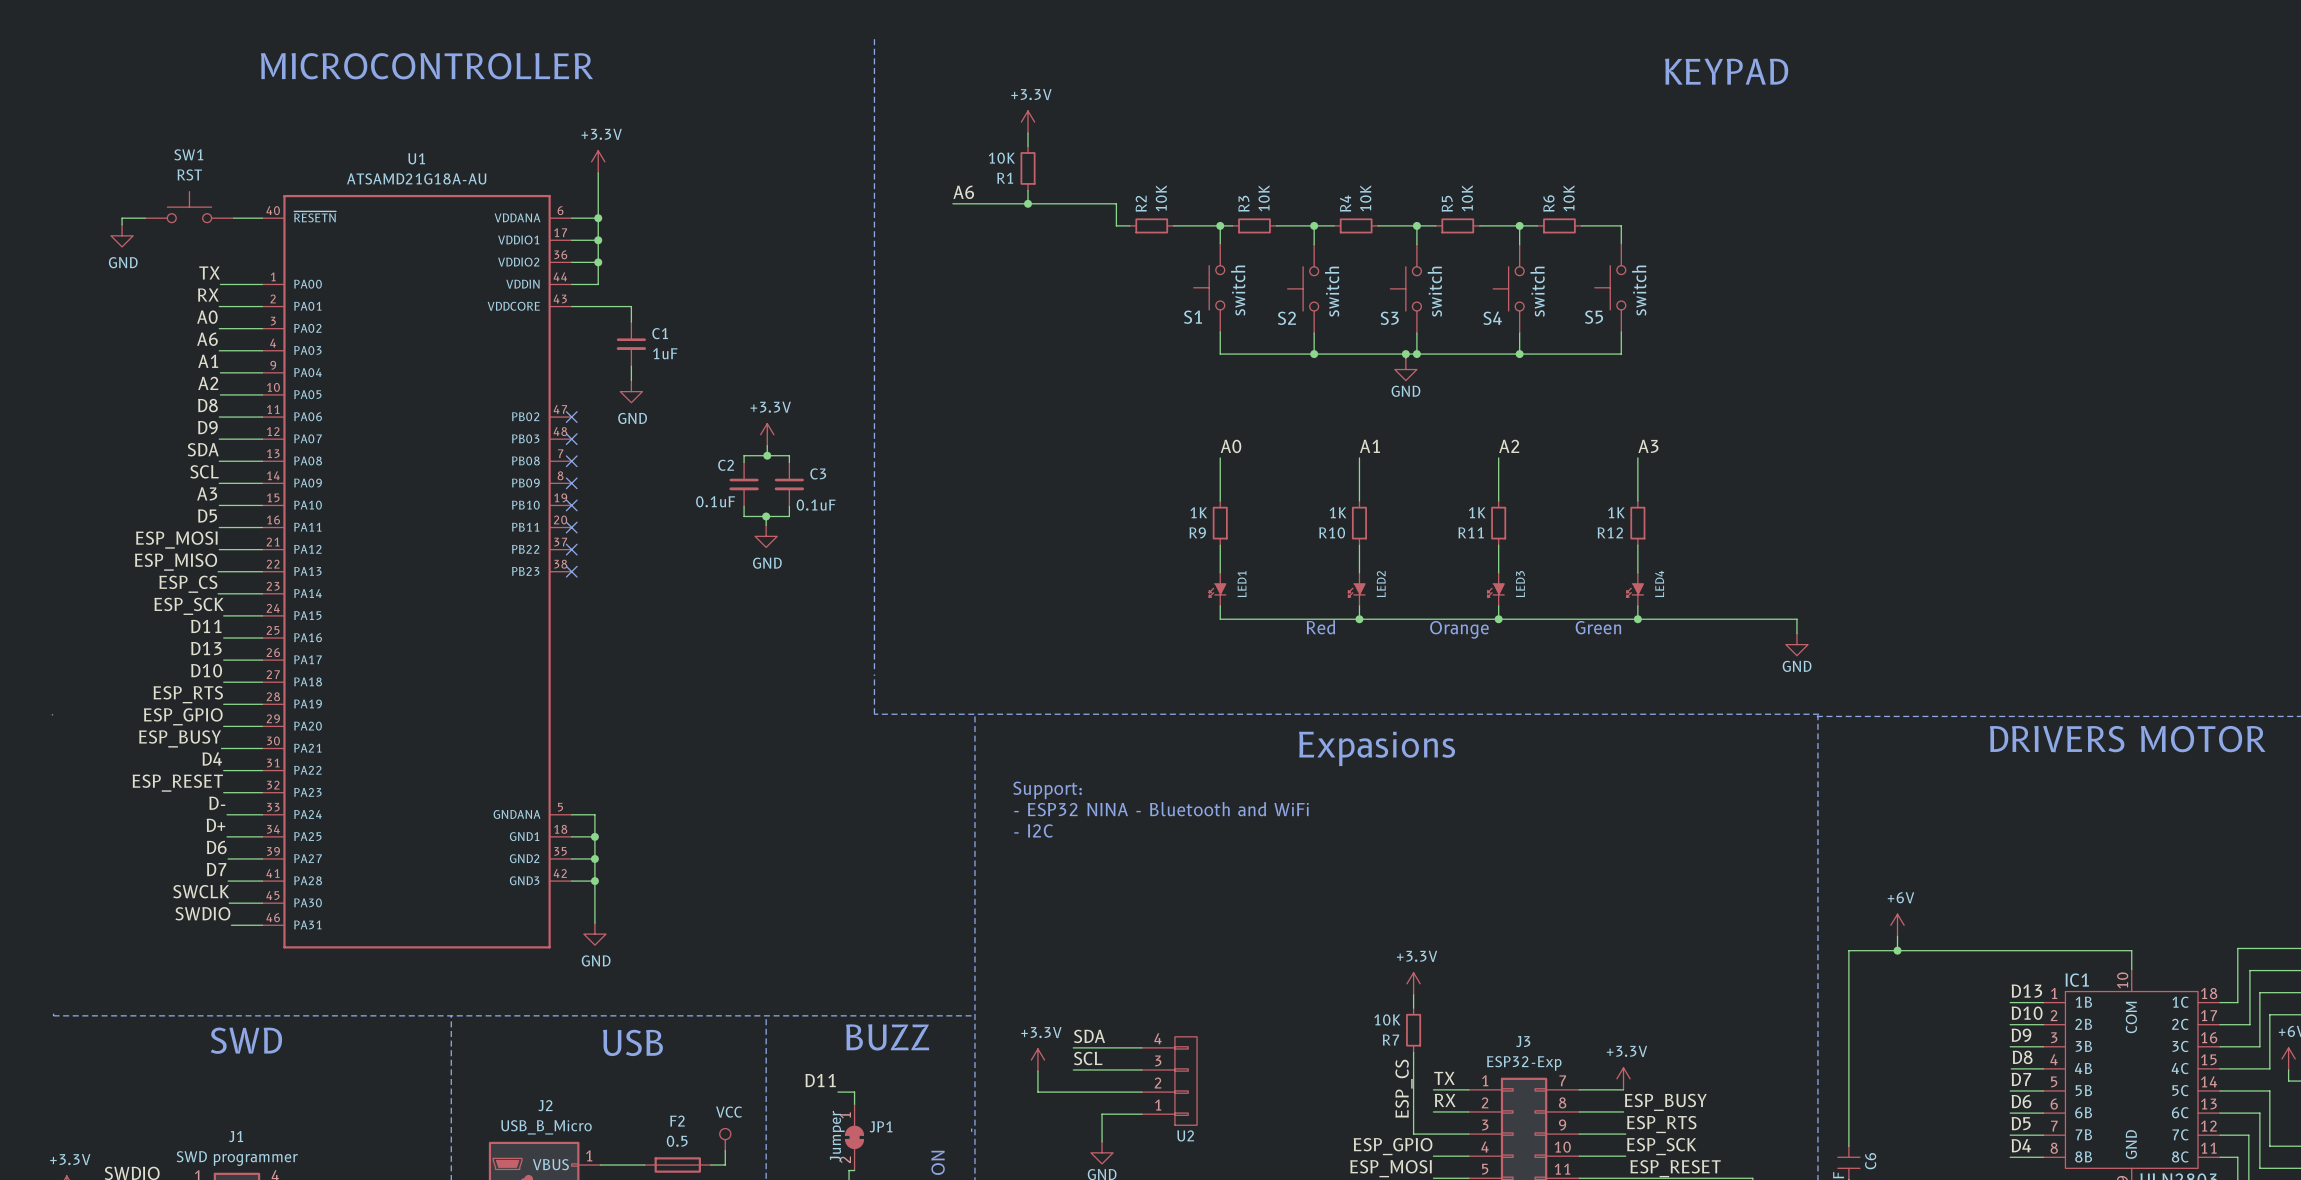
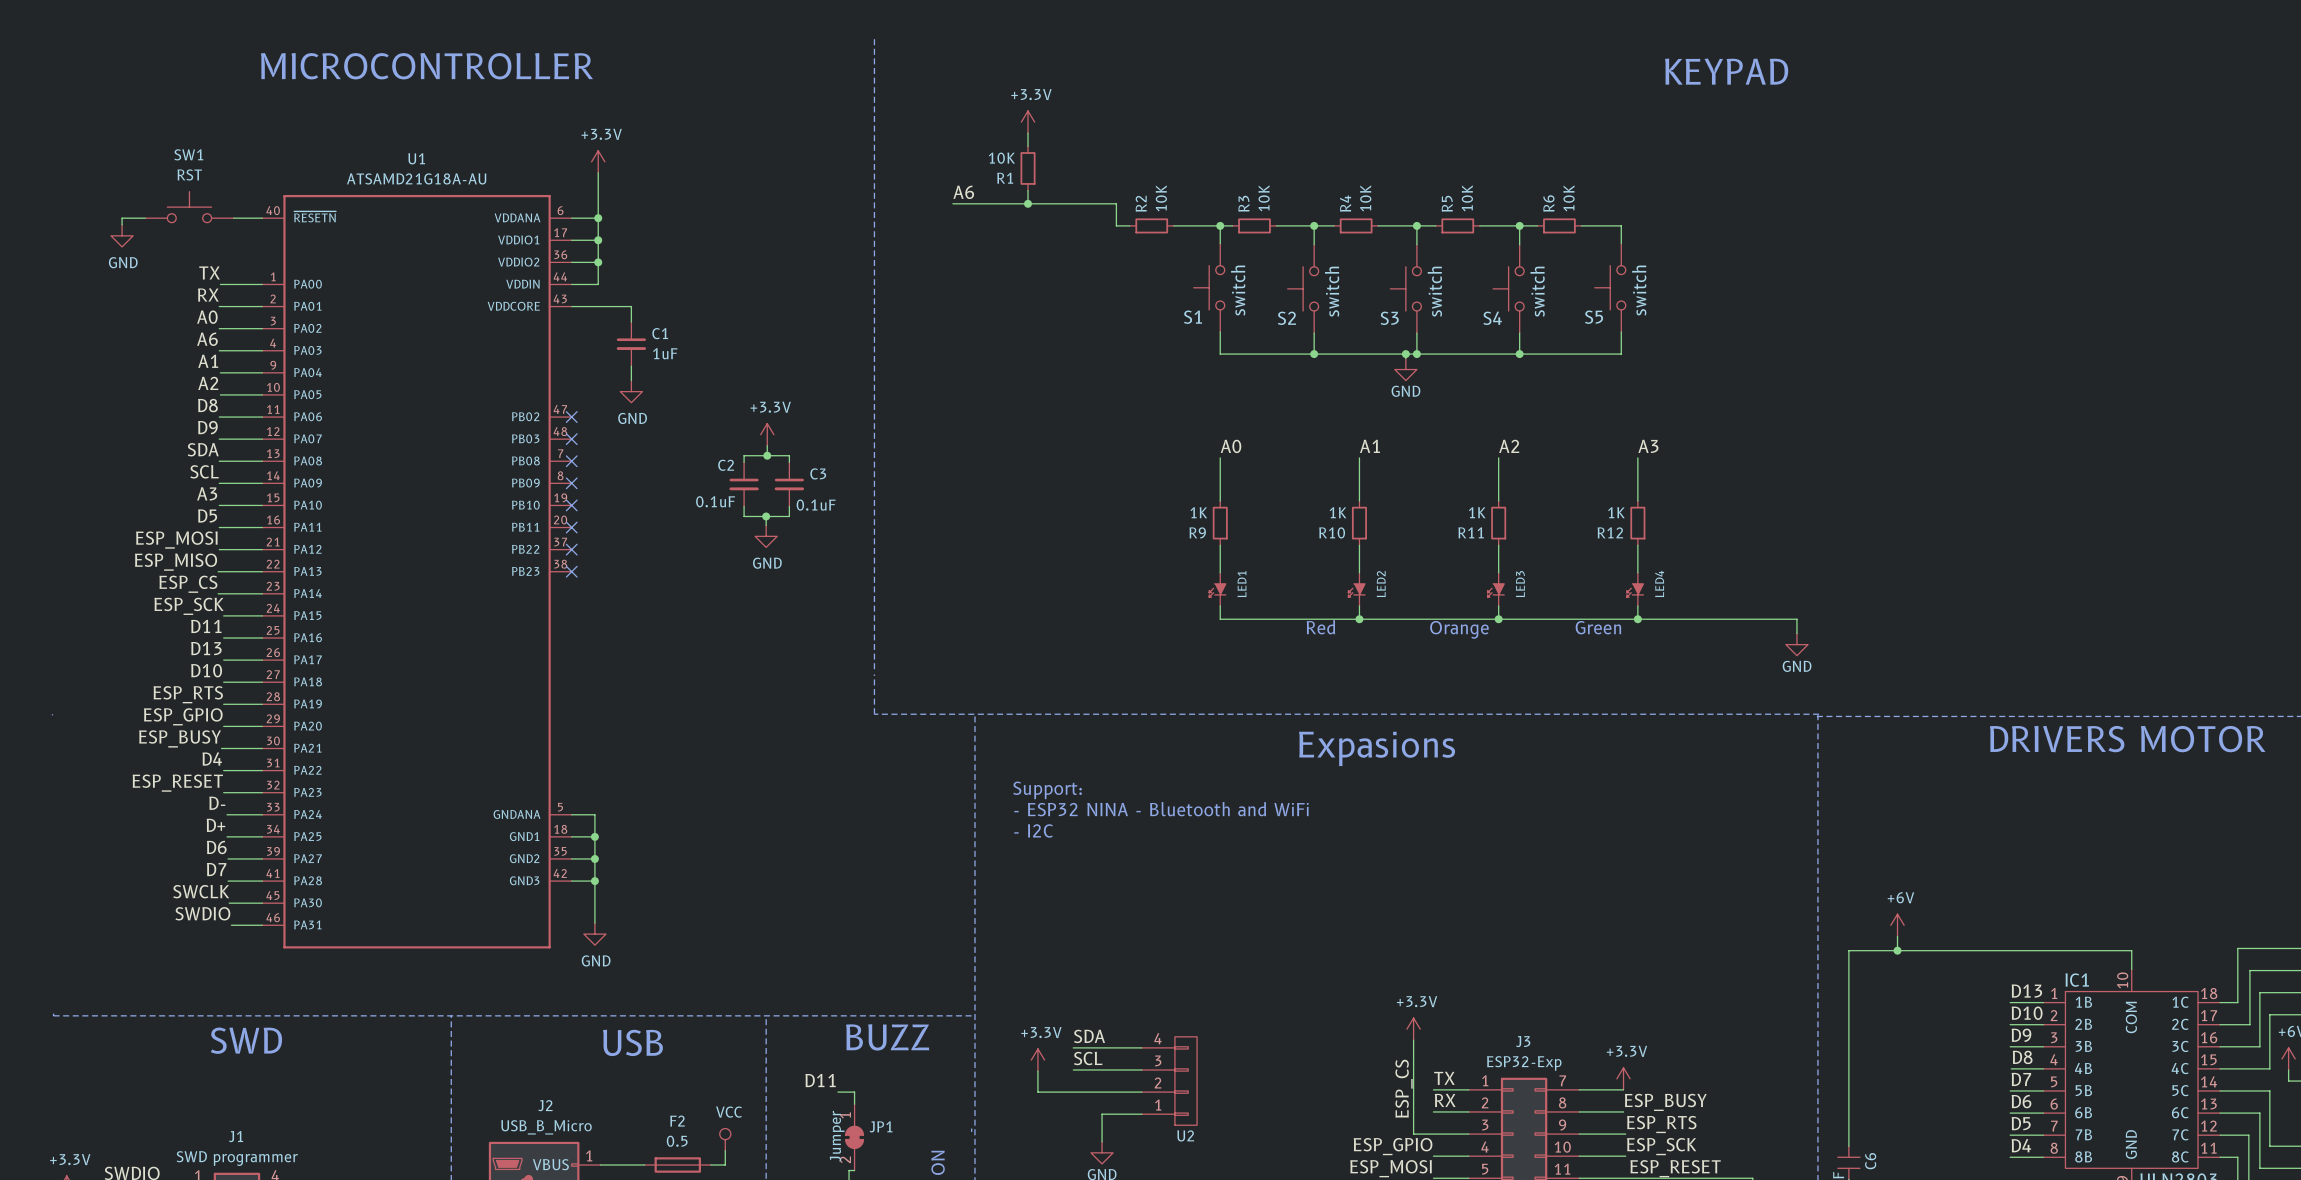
power symbol position: +3.3V (1413, 983) -> +3.3V (1413, 1029)
wire: (1413, 994) (1413, 1008) -> none
R7: 10K (1413, 1030) -> none

